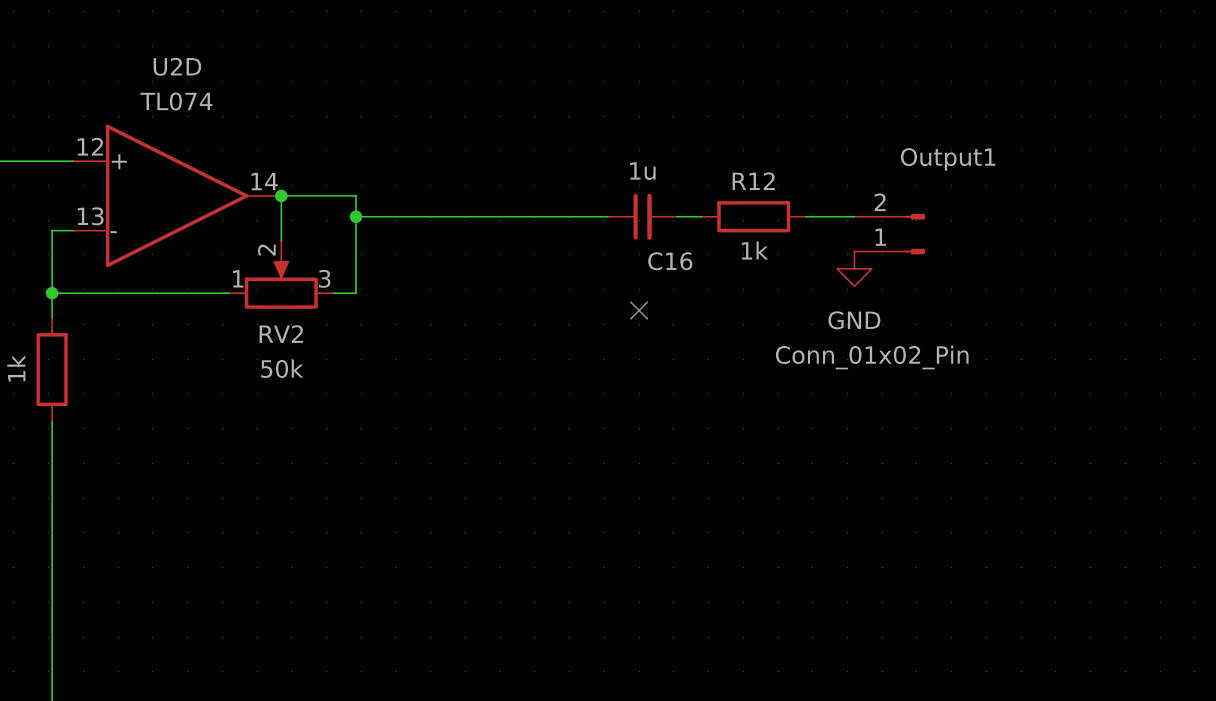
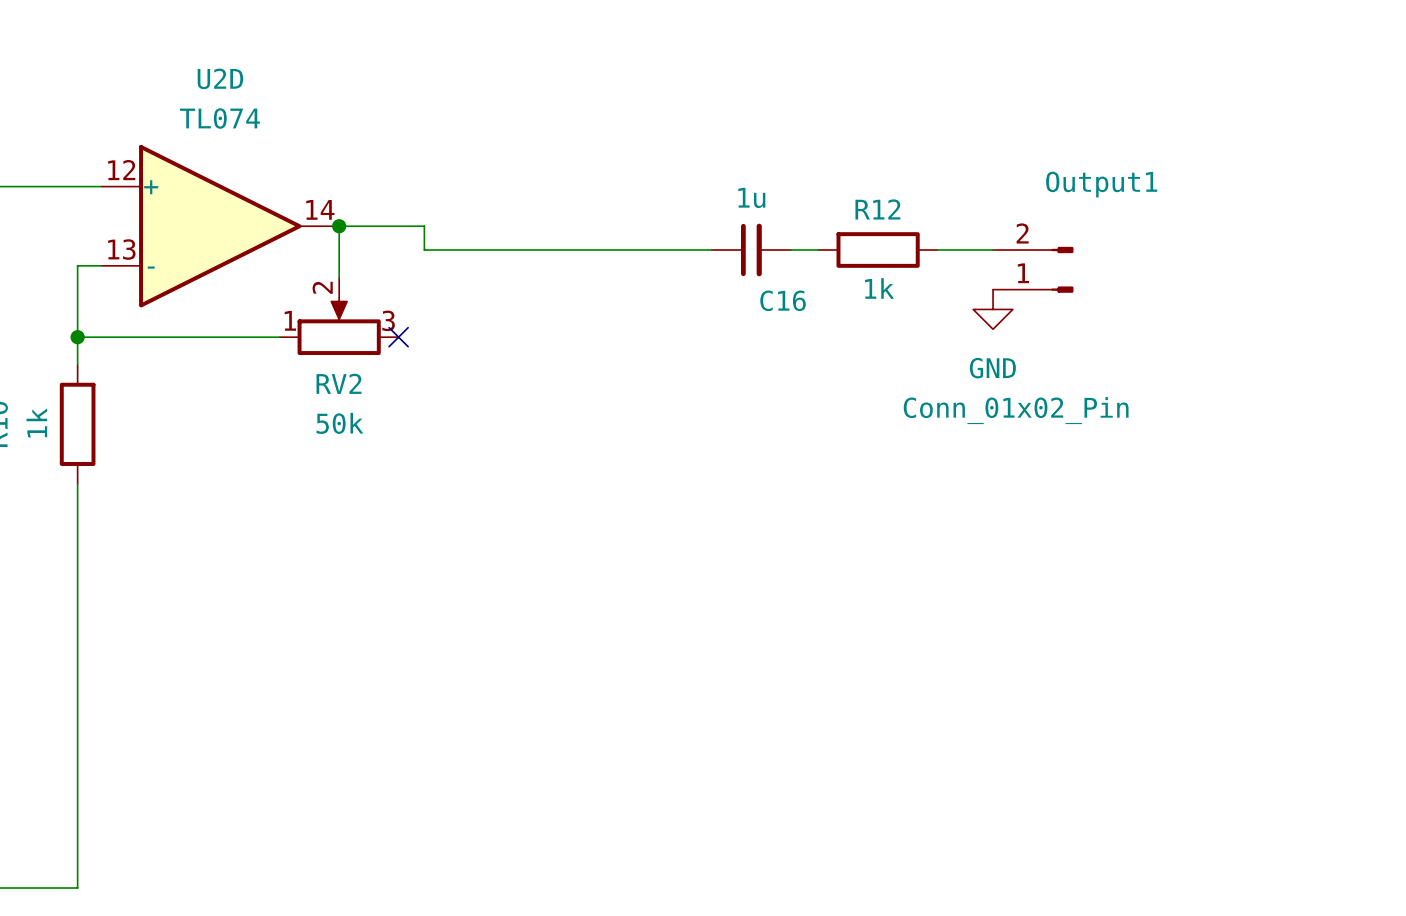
wire: (356, 216) (356, 293) (333, 293) -> none
junction: (356, 216) -> none
no-connect mark: none -> (398, 337)
no-connect mark: (639, 310) -> none

